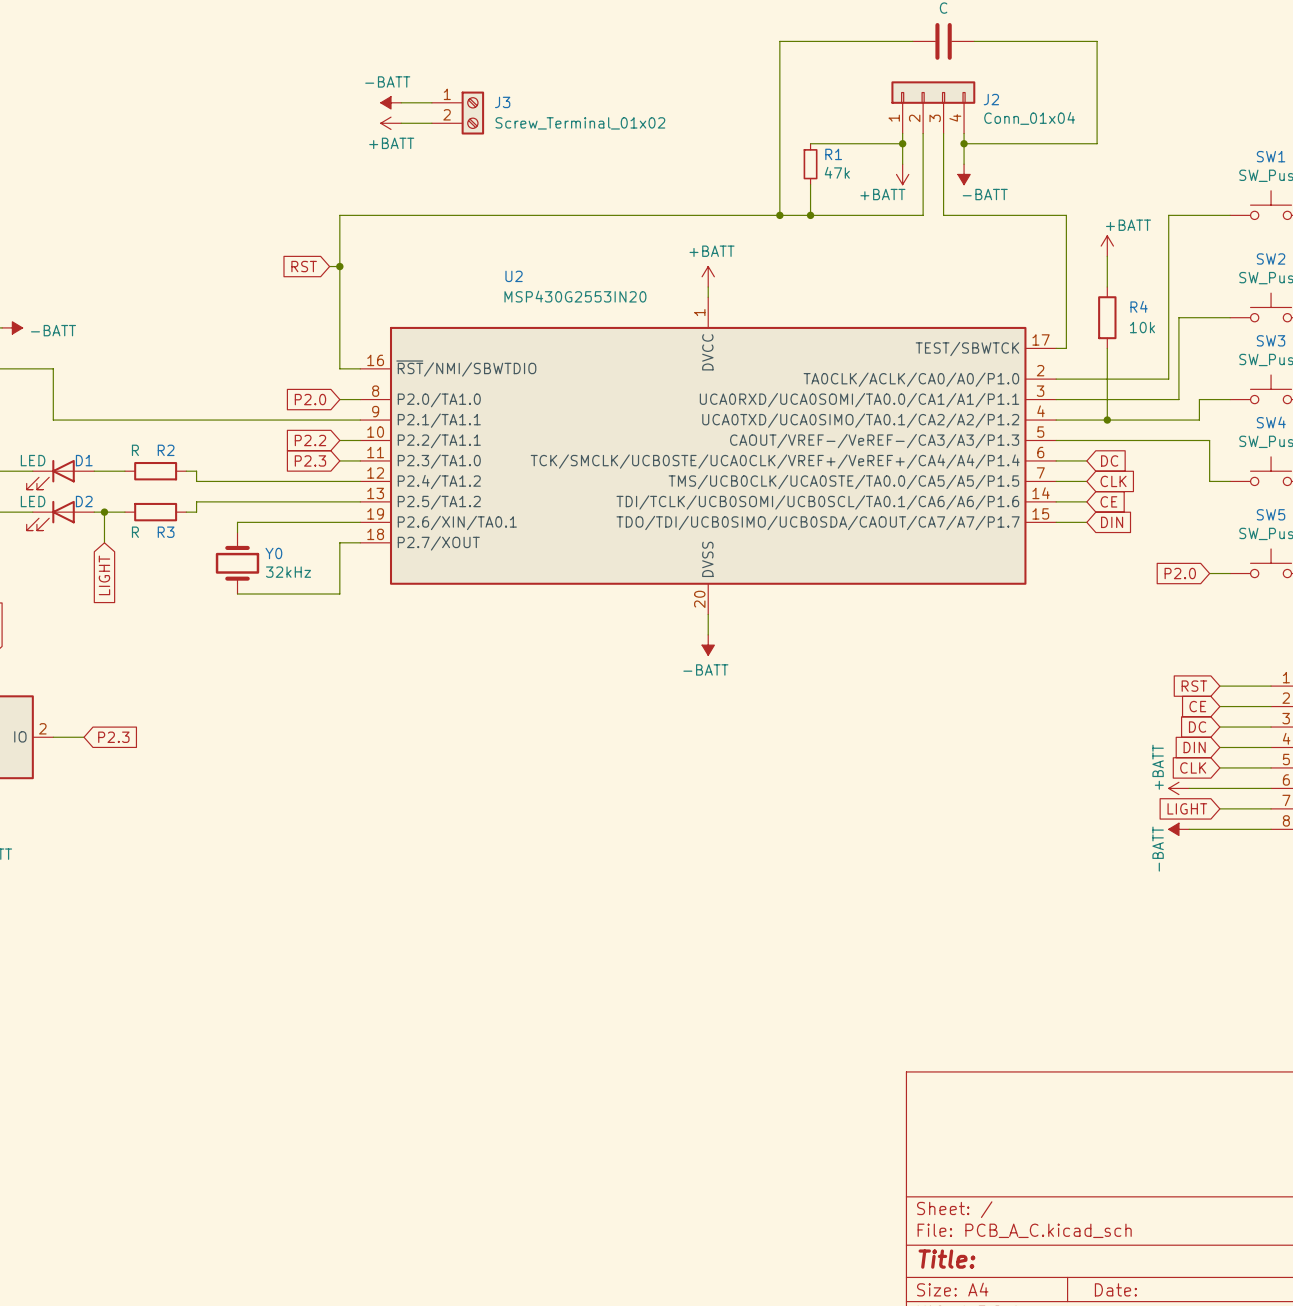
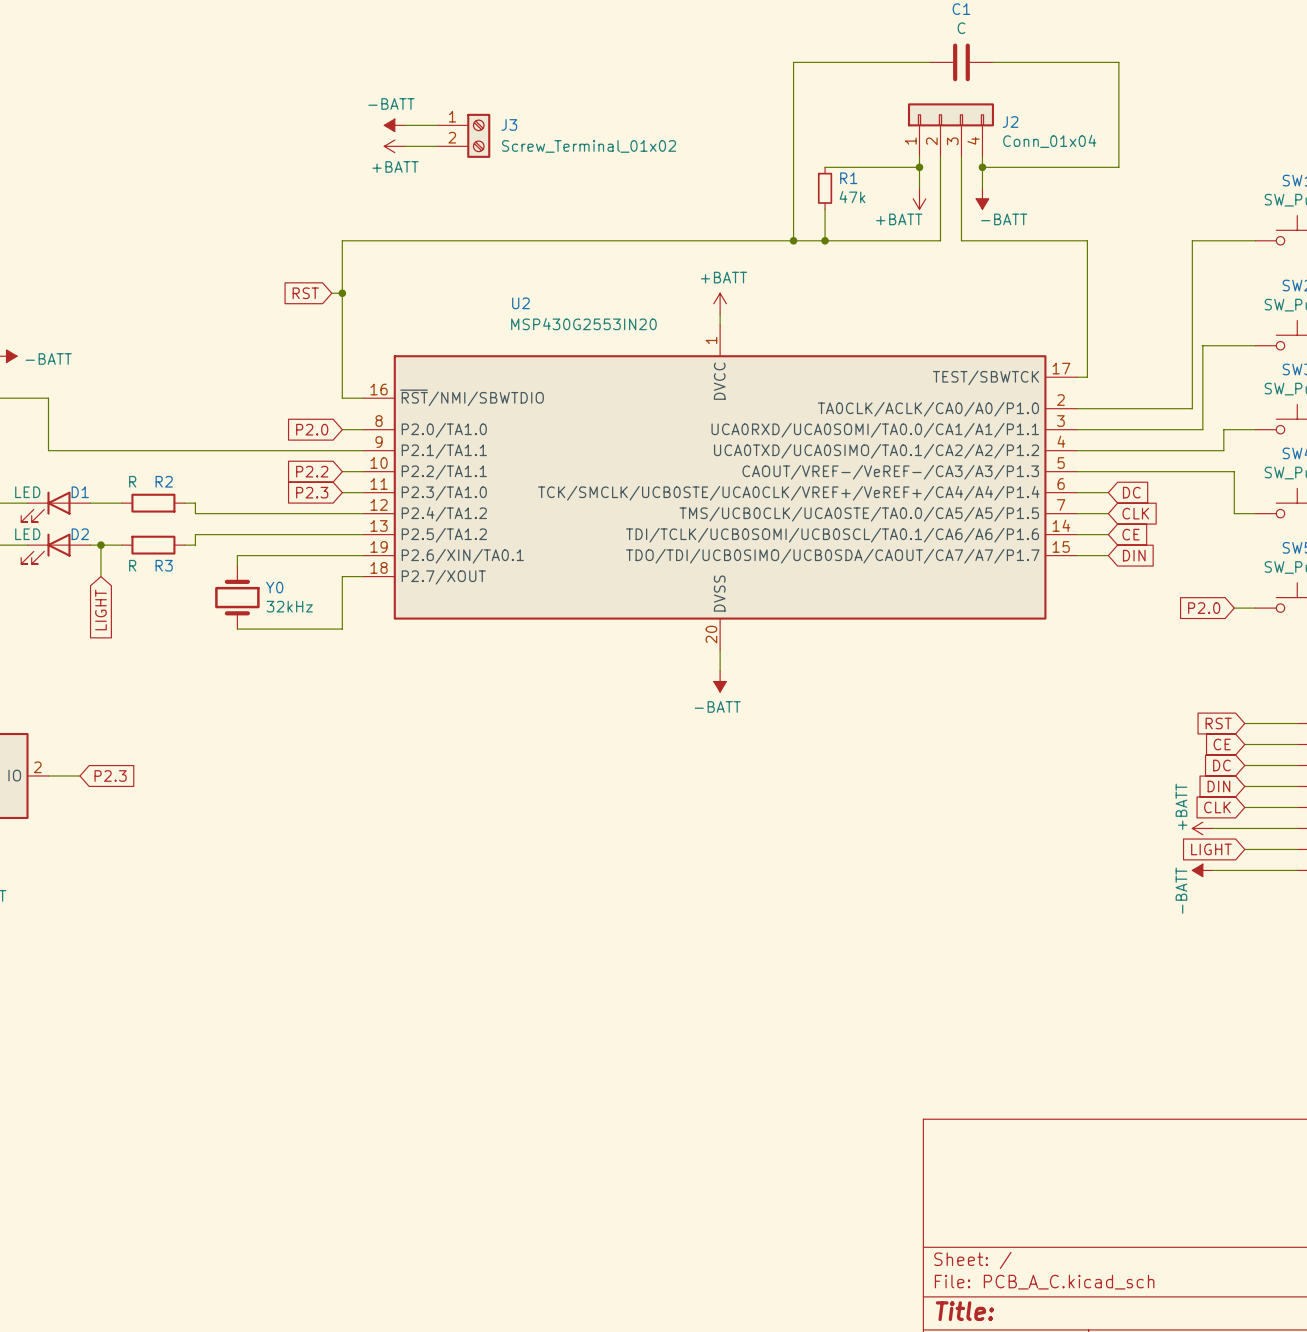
power symbol: +BATT (1107, 246) -> none
wire: (1107, 256) (1107, 287) -> none
R4: 10k (1107, 317) -> none
wire: (1107, 348) (1107, 420) -> none
junction: (1107, 420) -> none

